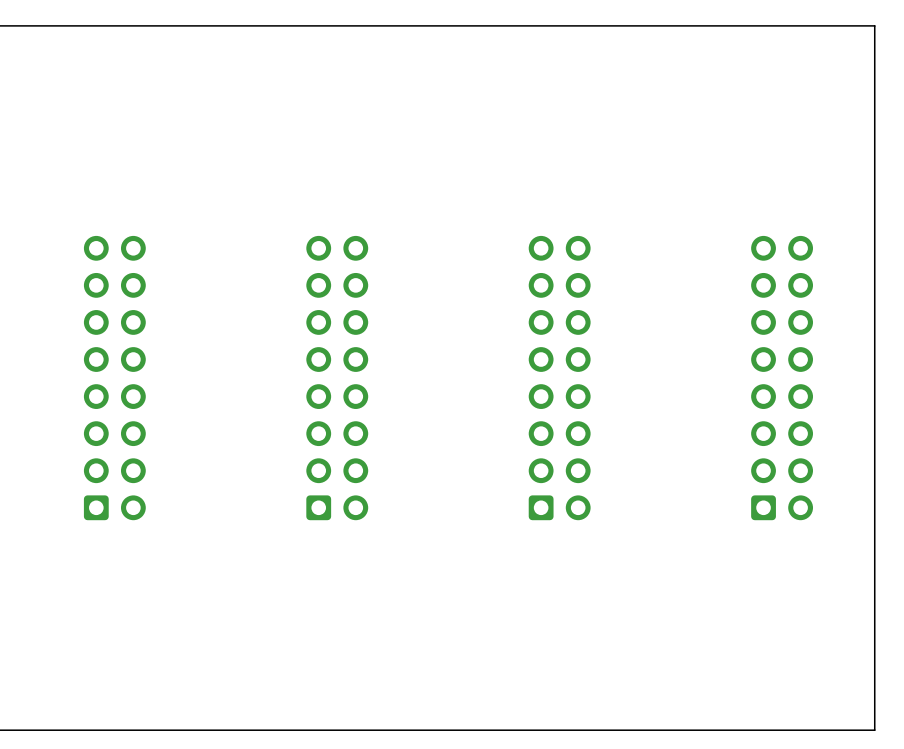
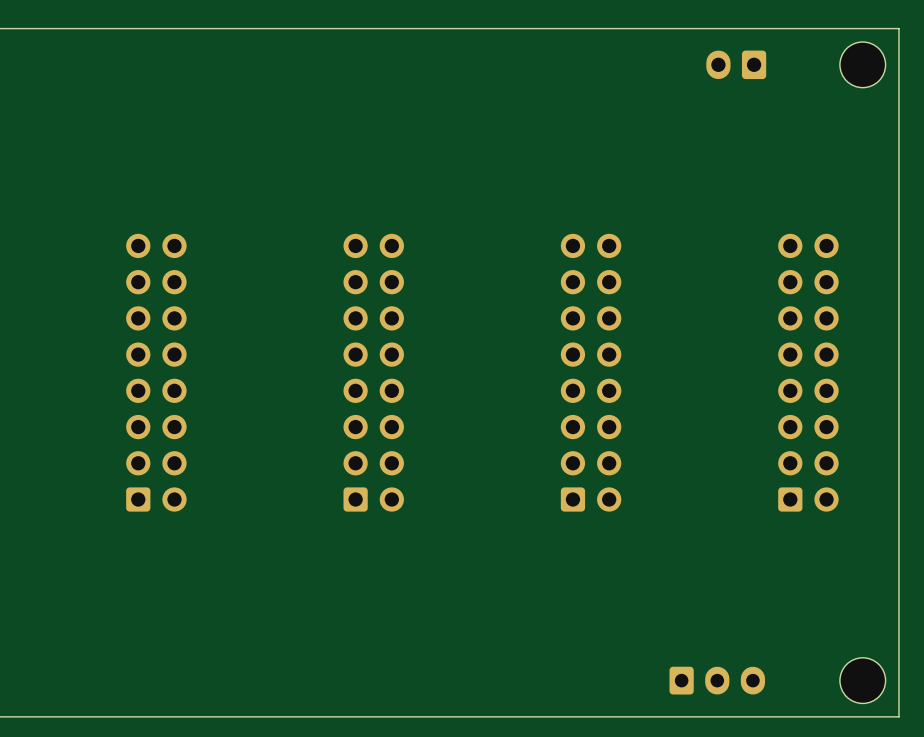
part: none -> (736, 64)
part: none -> (862, 64)
part: none -> (717, 680)
part: none -> (862, 680)

